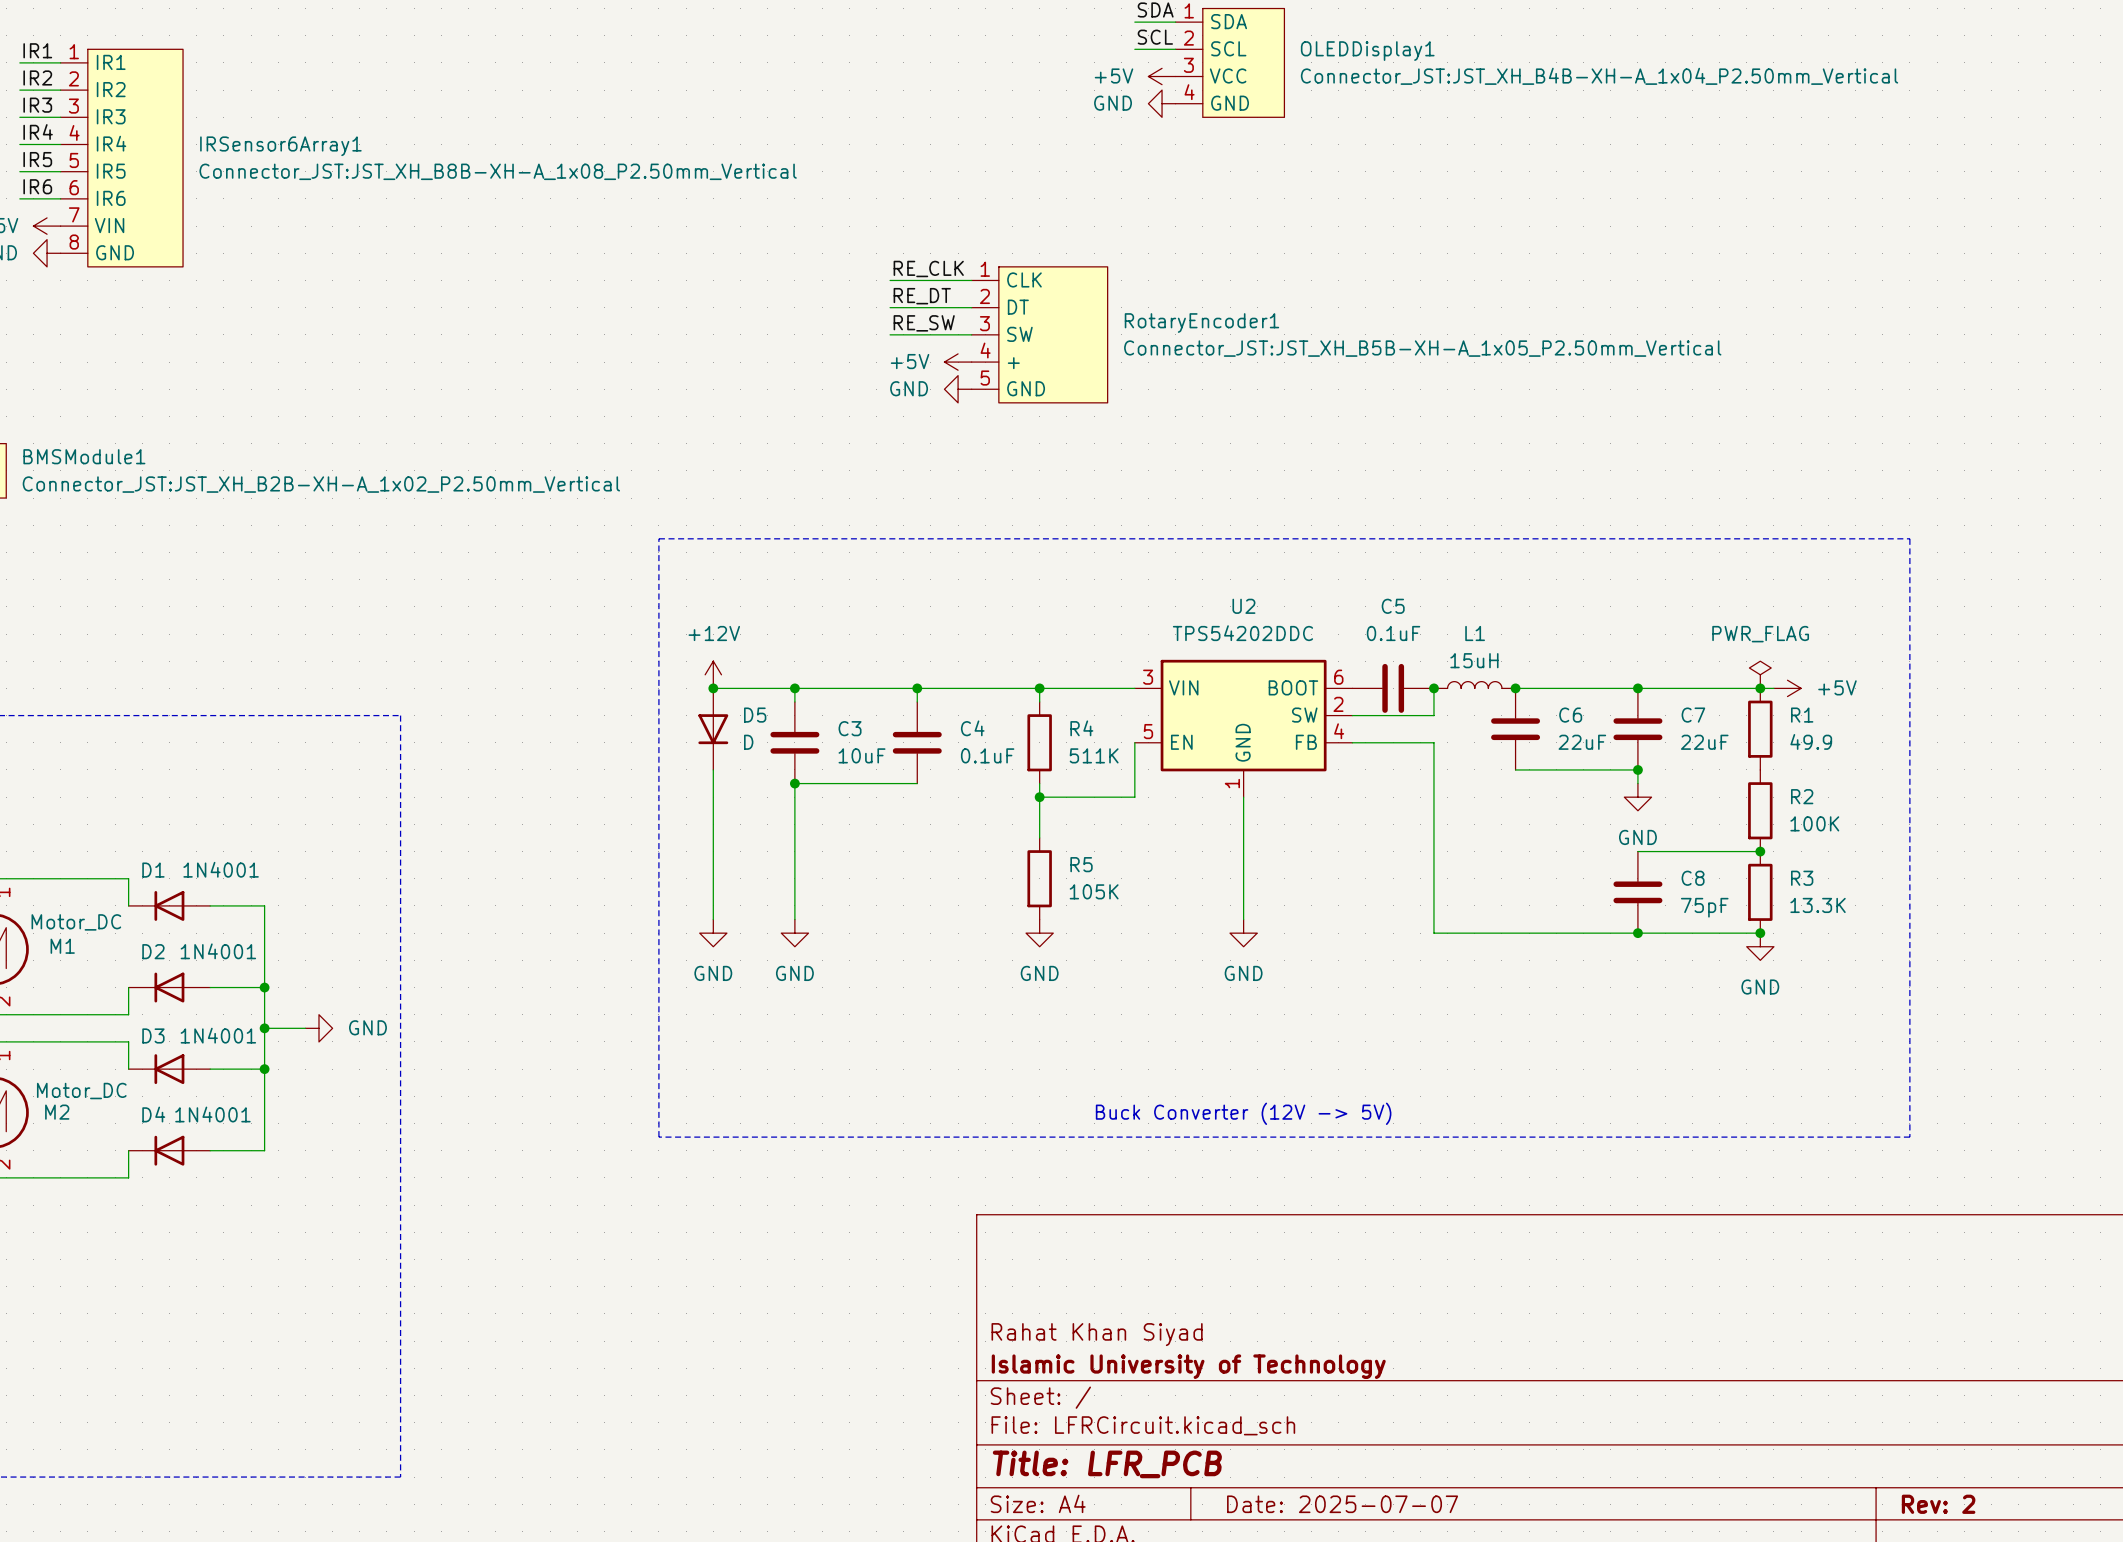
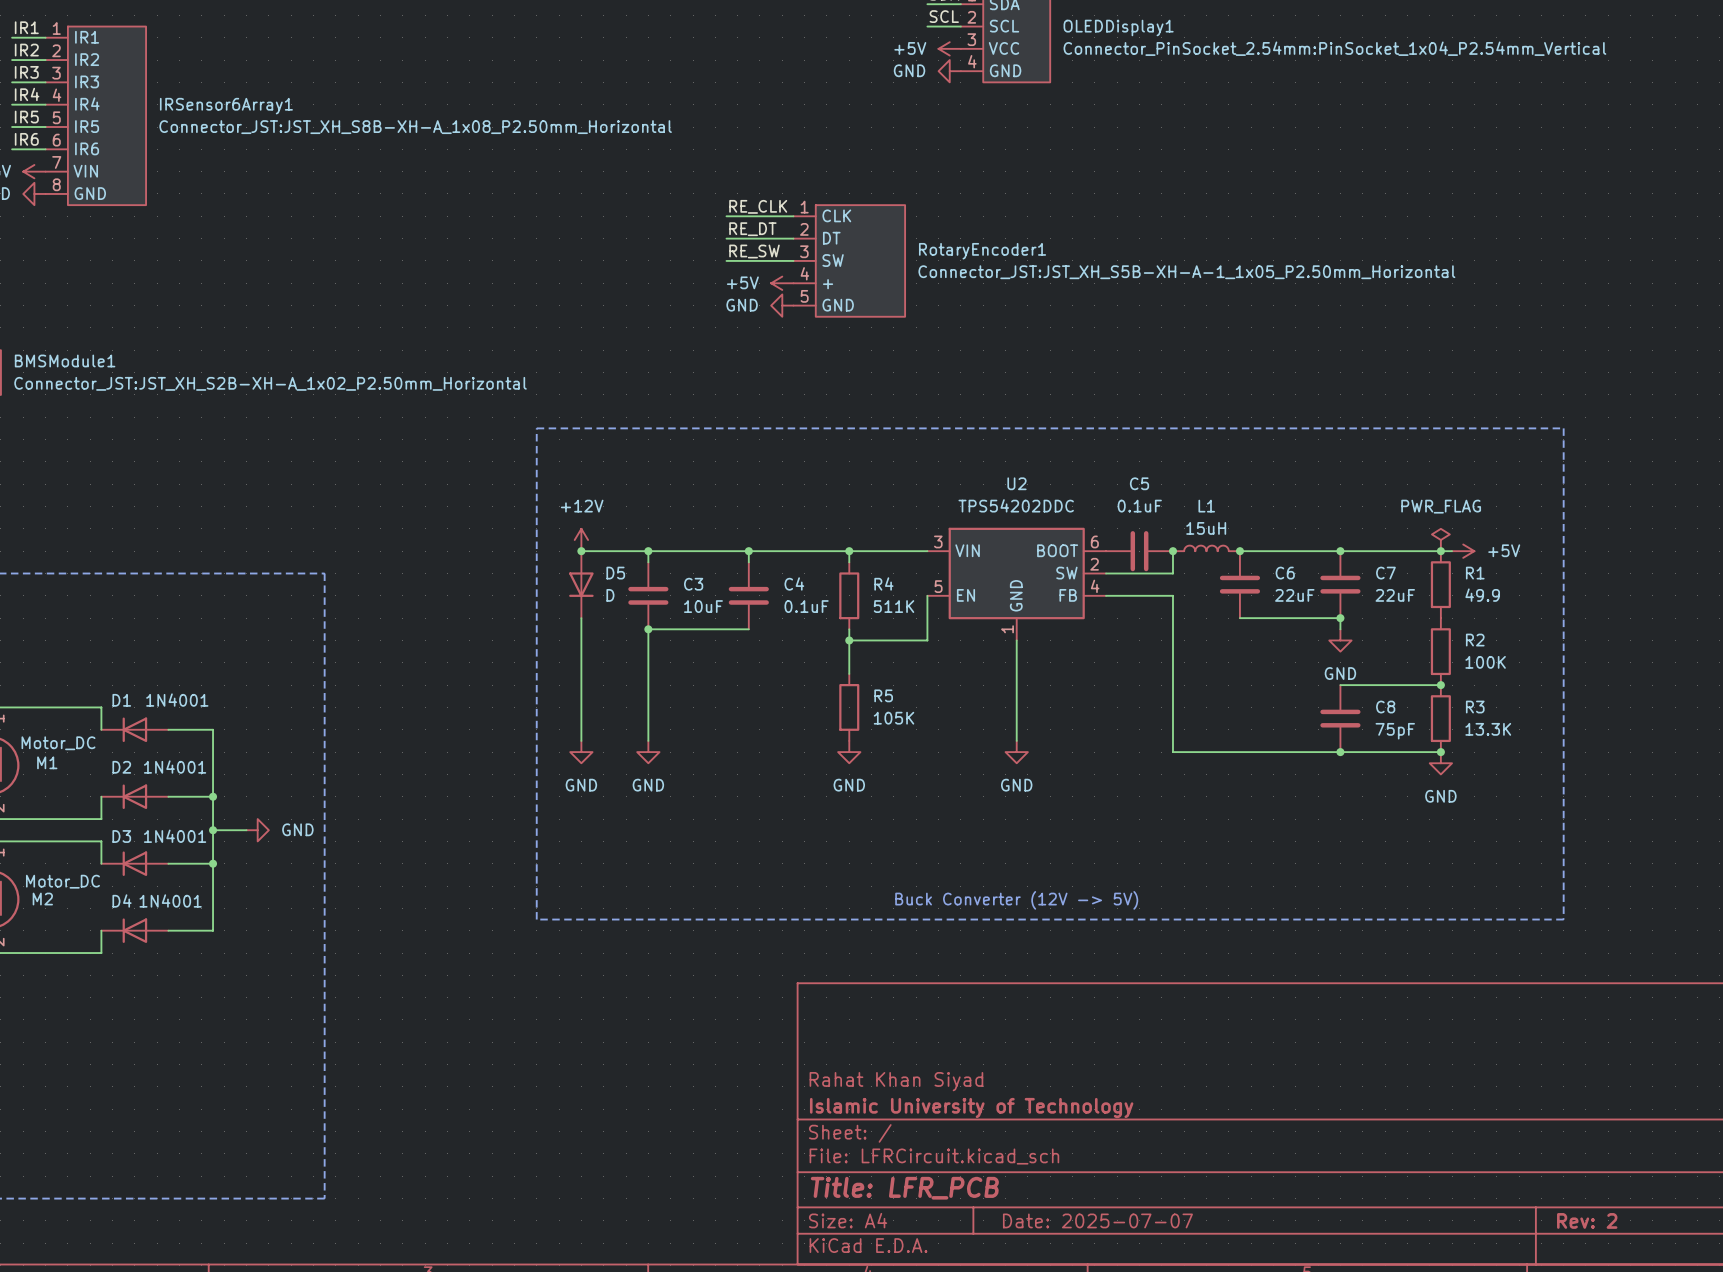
OLEDDisplay1 text: Connector_JST:JST_XH_B4B-XH-A_1x04_P2.50mm_Vertical (1599, 76) -> Connector_PinSocket_2.54mm:PinSocket_1x04_P2.54mm_Vertical (1334, 48)
IRSensor6Array1 text: Connector_JST:JST_XH_B8B-XH-A_1x08_P2.50mm_Vertical (498, 171) -> Connector_JST:JST_XH_S8B-XH-A_1x08_P2.50mm_Horizontal (415, 127)
RotaryEncoder1 text: Connector_JST:JST_XH_B5B-XH-A_1x05_P2.50mm_Vertical (1422, 348) -> Connector_JST:JST_XH_S5B-XH-A-1_1x05_P2.50mm_Horizontal (1186, 272)
BMSModule1 text: Connector_JST:JST_XH_B2B-XH-A_1x02_P2.50mm_Vertical (321, 484) -> Connector_JST:JST_XH_S2B-XH-A_1x02_P2.50mm_Horizontal (270, 383)

